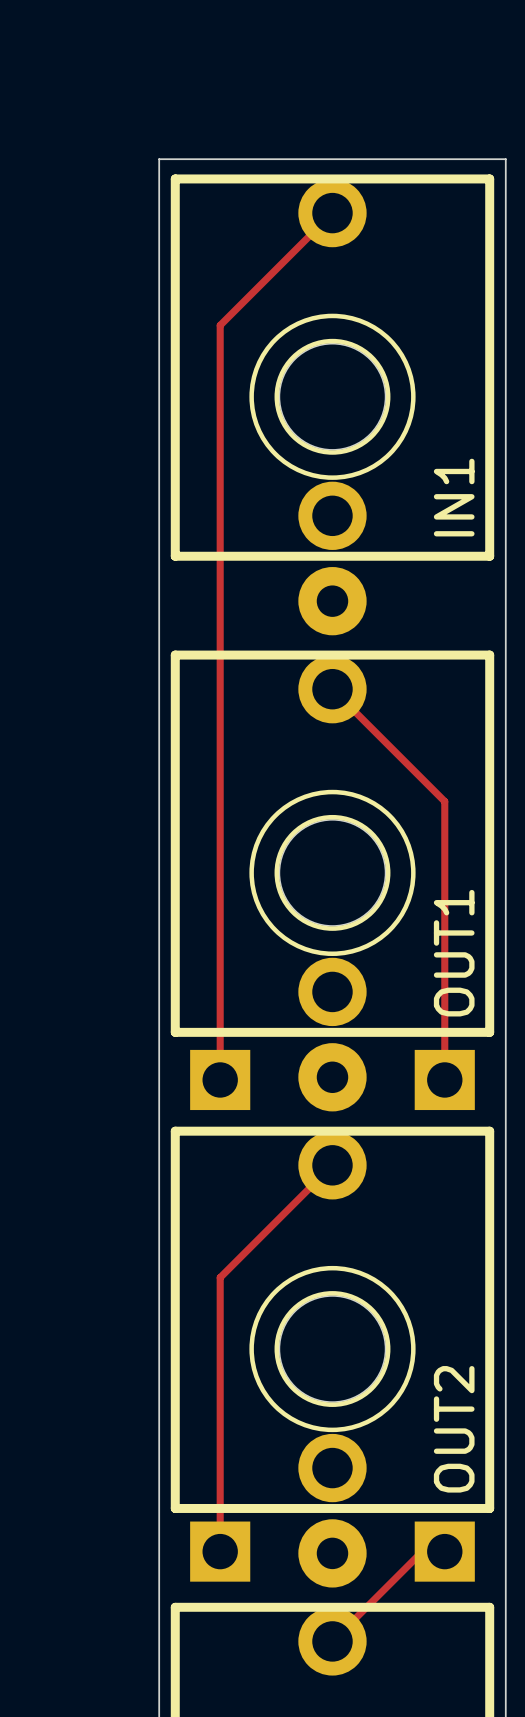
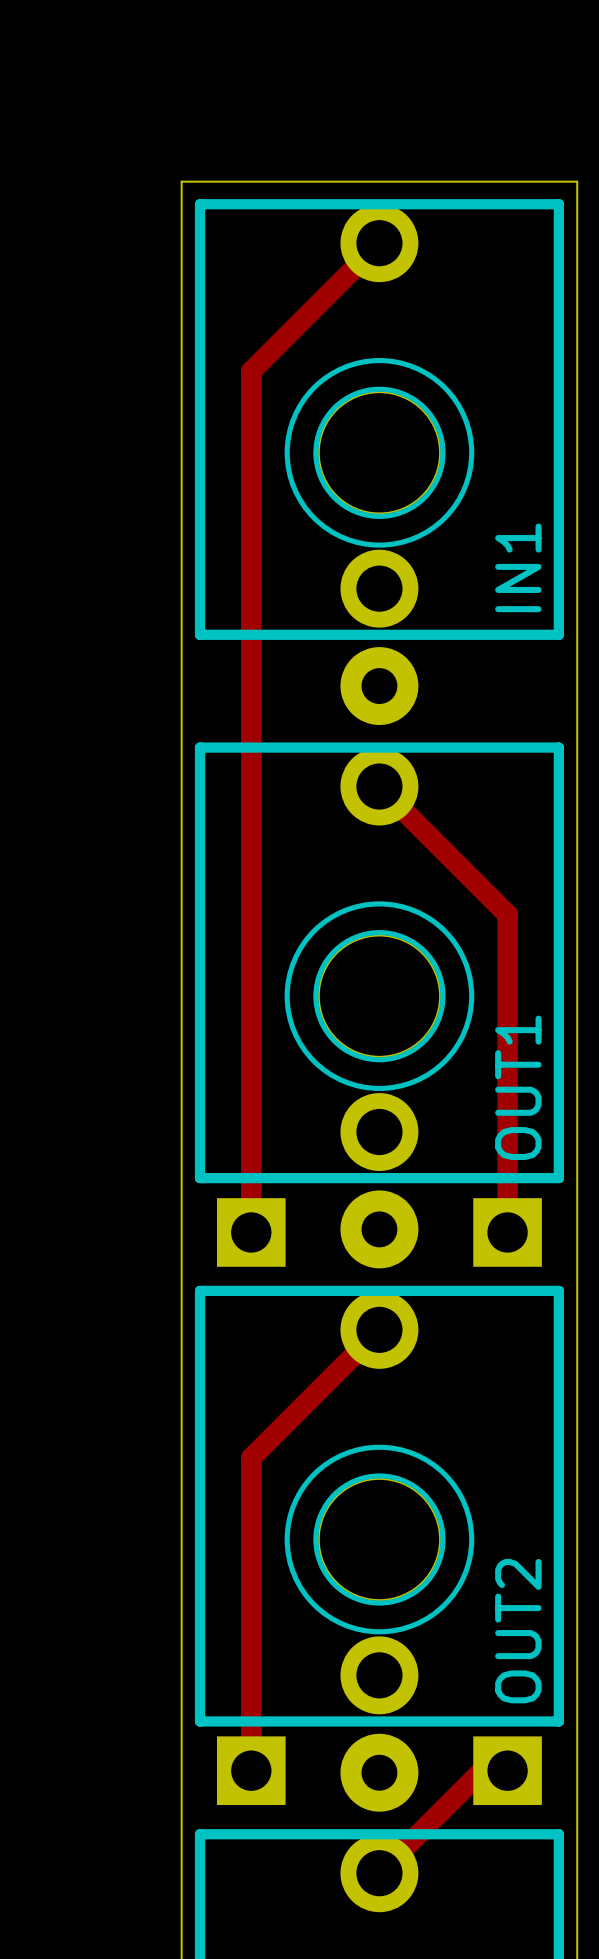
top track width: thin (332, 213) (220, 325) (220, 1079) -> thick (379, 243) (251, 371) (251, 1232)
top track width: thin (332, 689) (444, 801) (444, 1079) -> thick (379, 786) (507, 914) (507, 1232)
top track width: thin (332, 1165) (220, 1277) (220, 1551) -> thick (379, 1329) (251, 1458) (251, 1770)
top track width: thin (444, 1551) (422, 1551) (332, 1641) -> thick (507, 1770) (481, 1770) (379, 1873)

